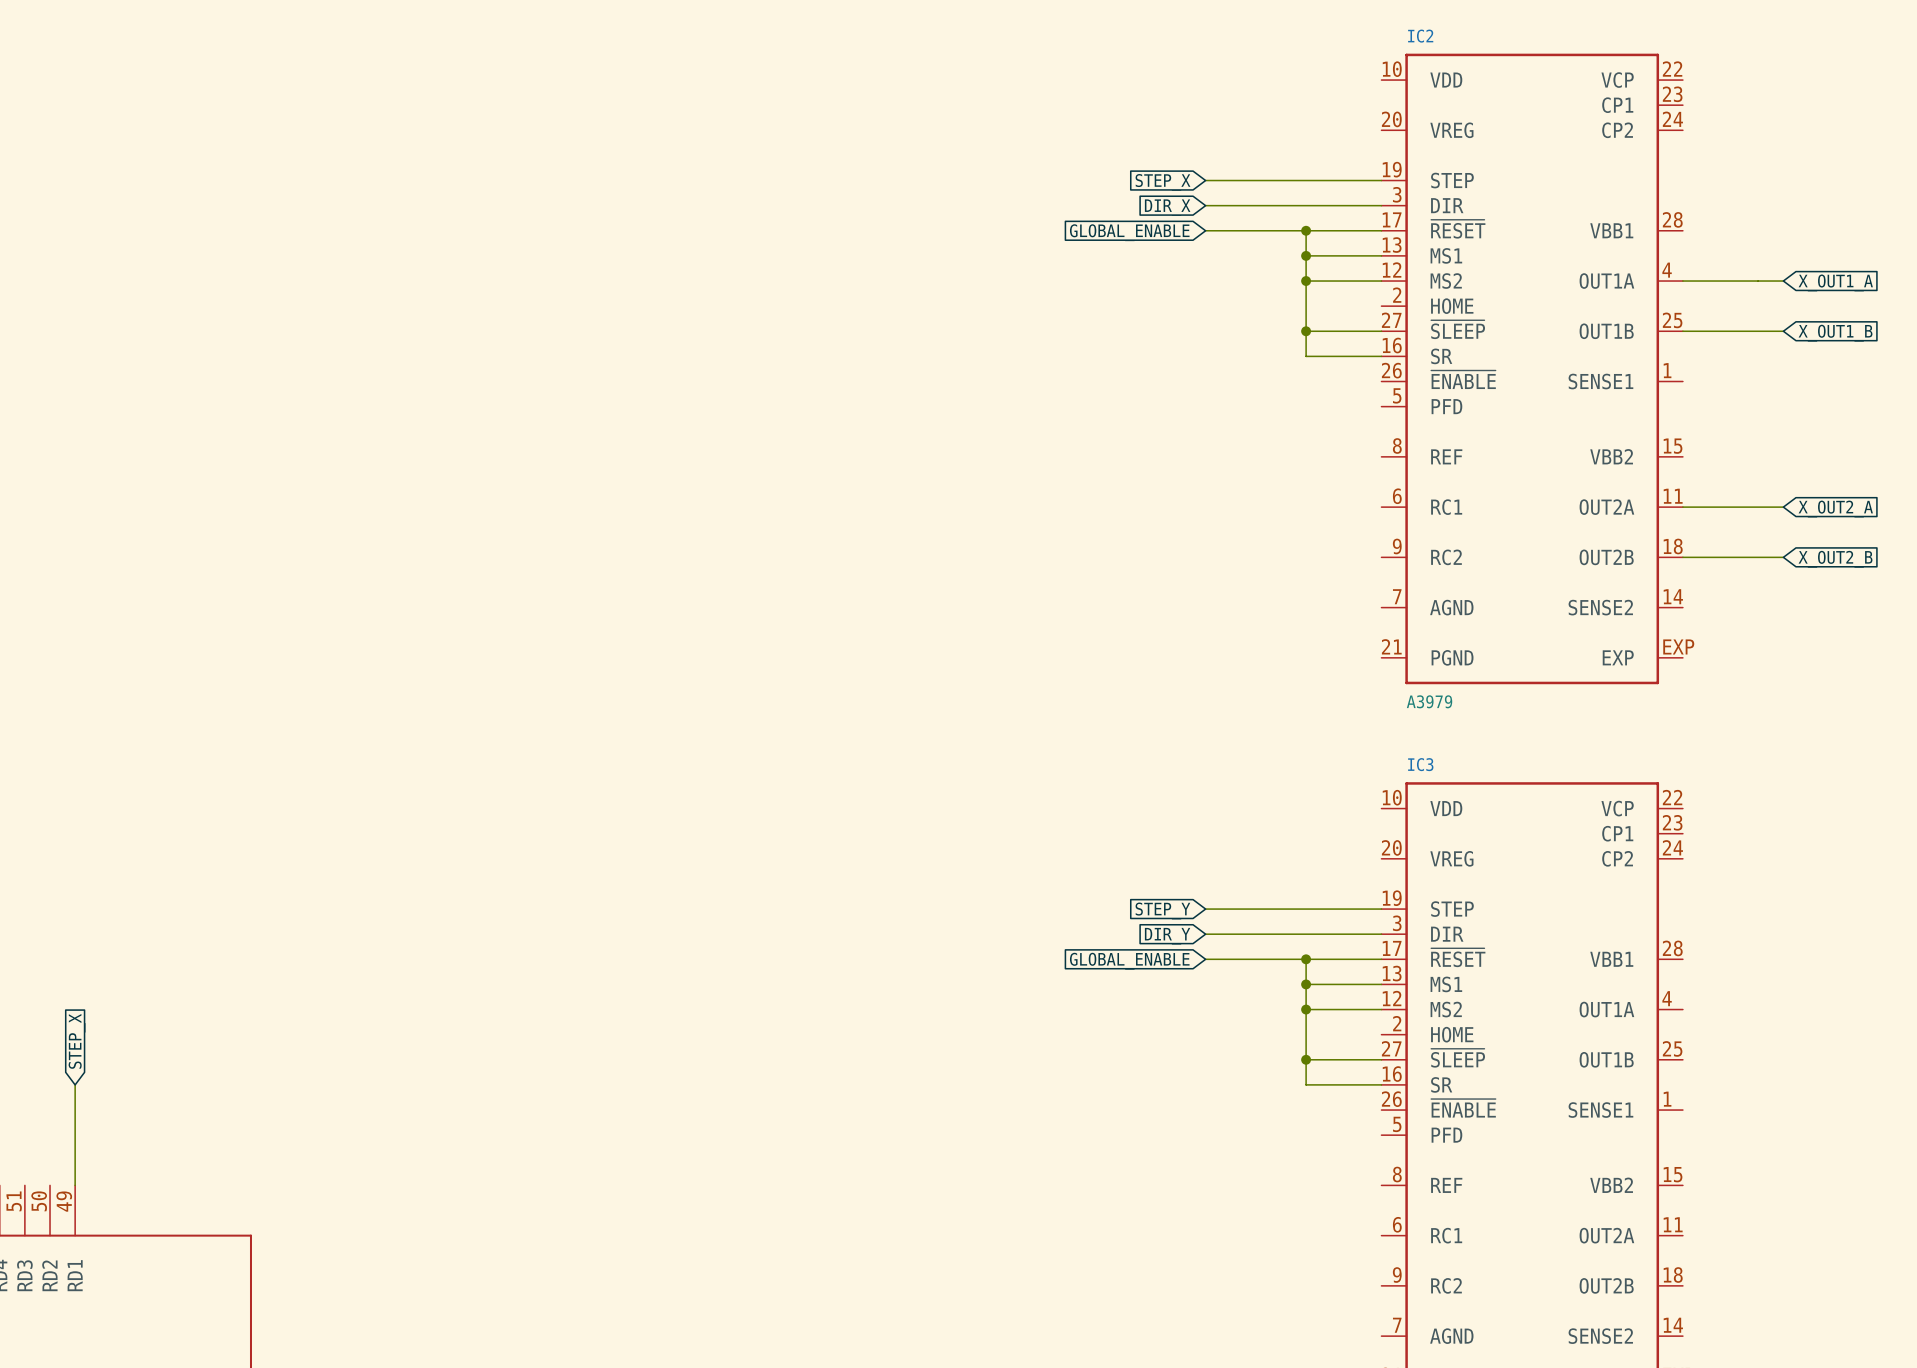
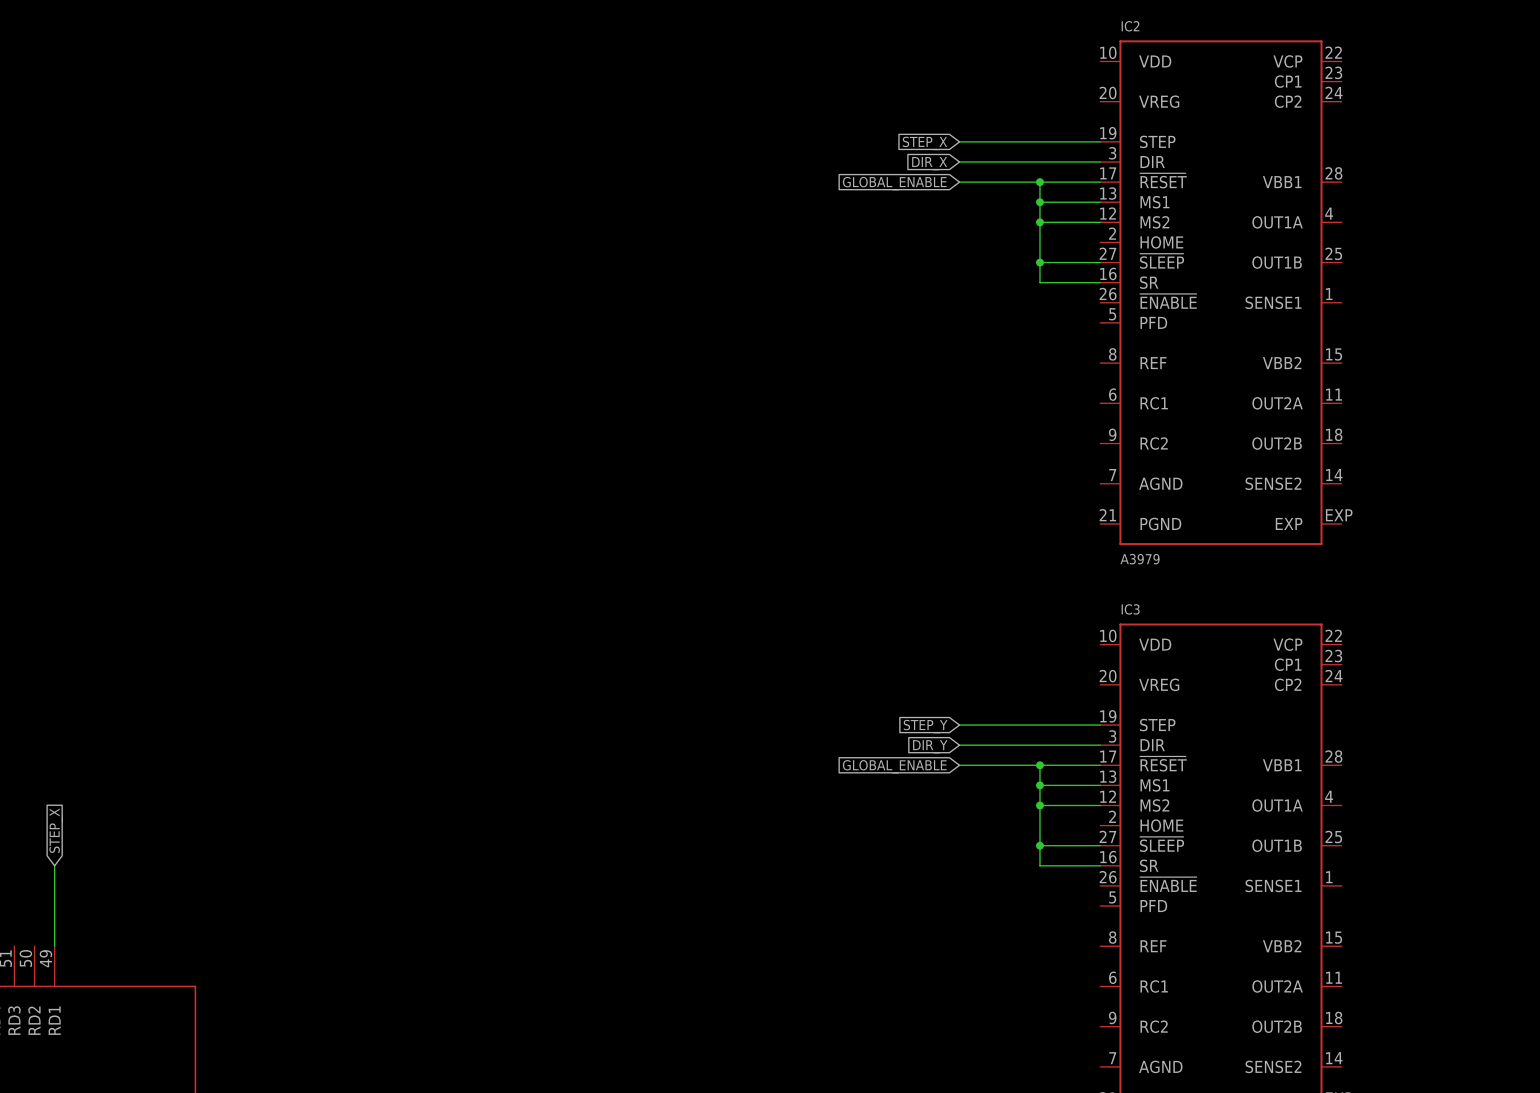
wire: (1682, 281) (1783, 281) -> none
global label: X_OUT1_A (1835, 282) -> none
wire: (1682, 331) (1783, 331) -> none
global label: X_OUT1_B (1835, 333) -> none
wire: (1682, 507) (1783, 507) -> none
global label: X_OUT2_A (1835, 509) -> none
wire: (1682, 557) (1783, 557) -> none
global label: X_OUT2_B (1835, 559) -> none

